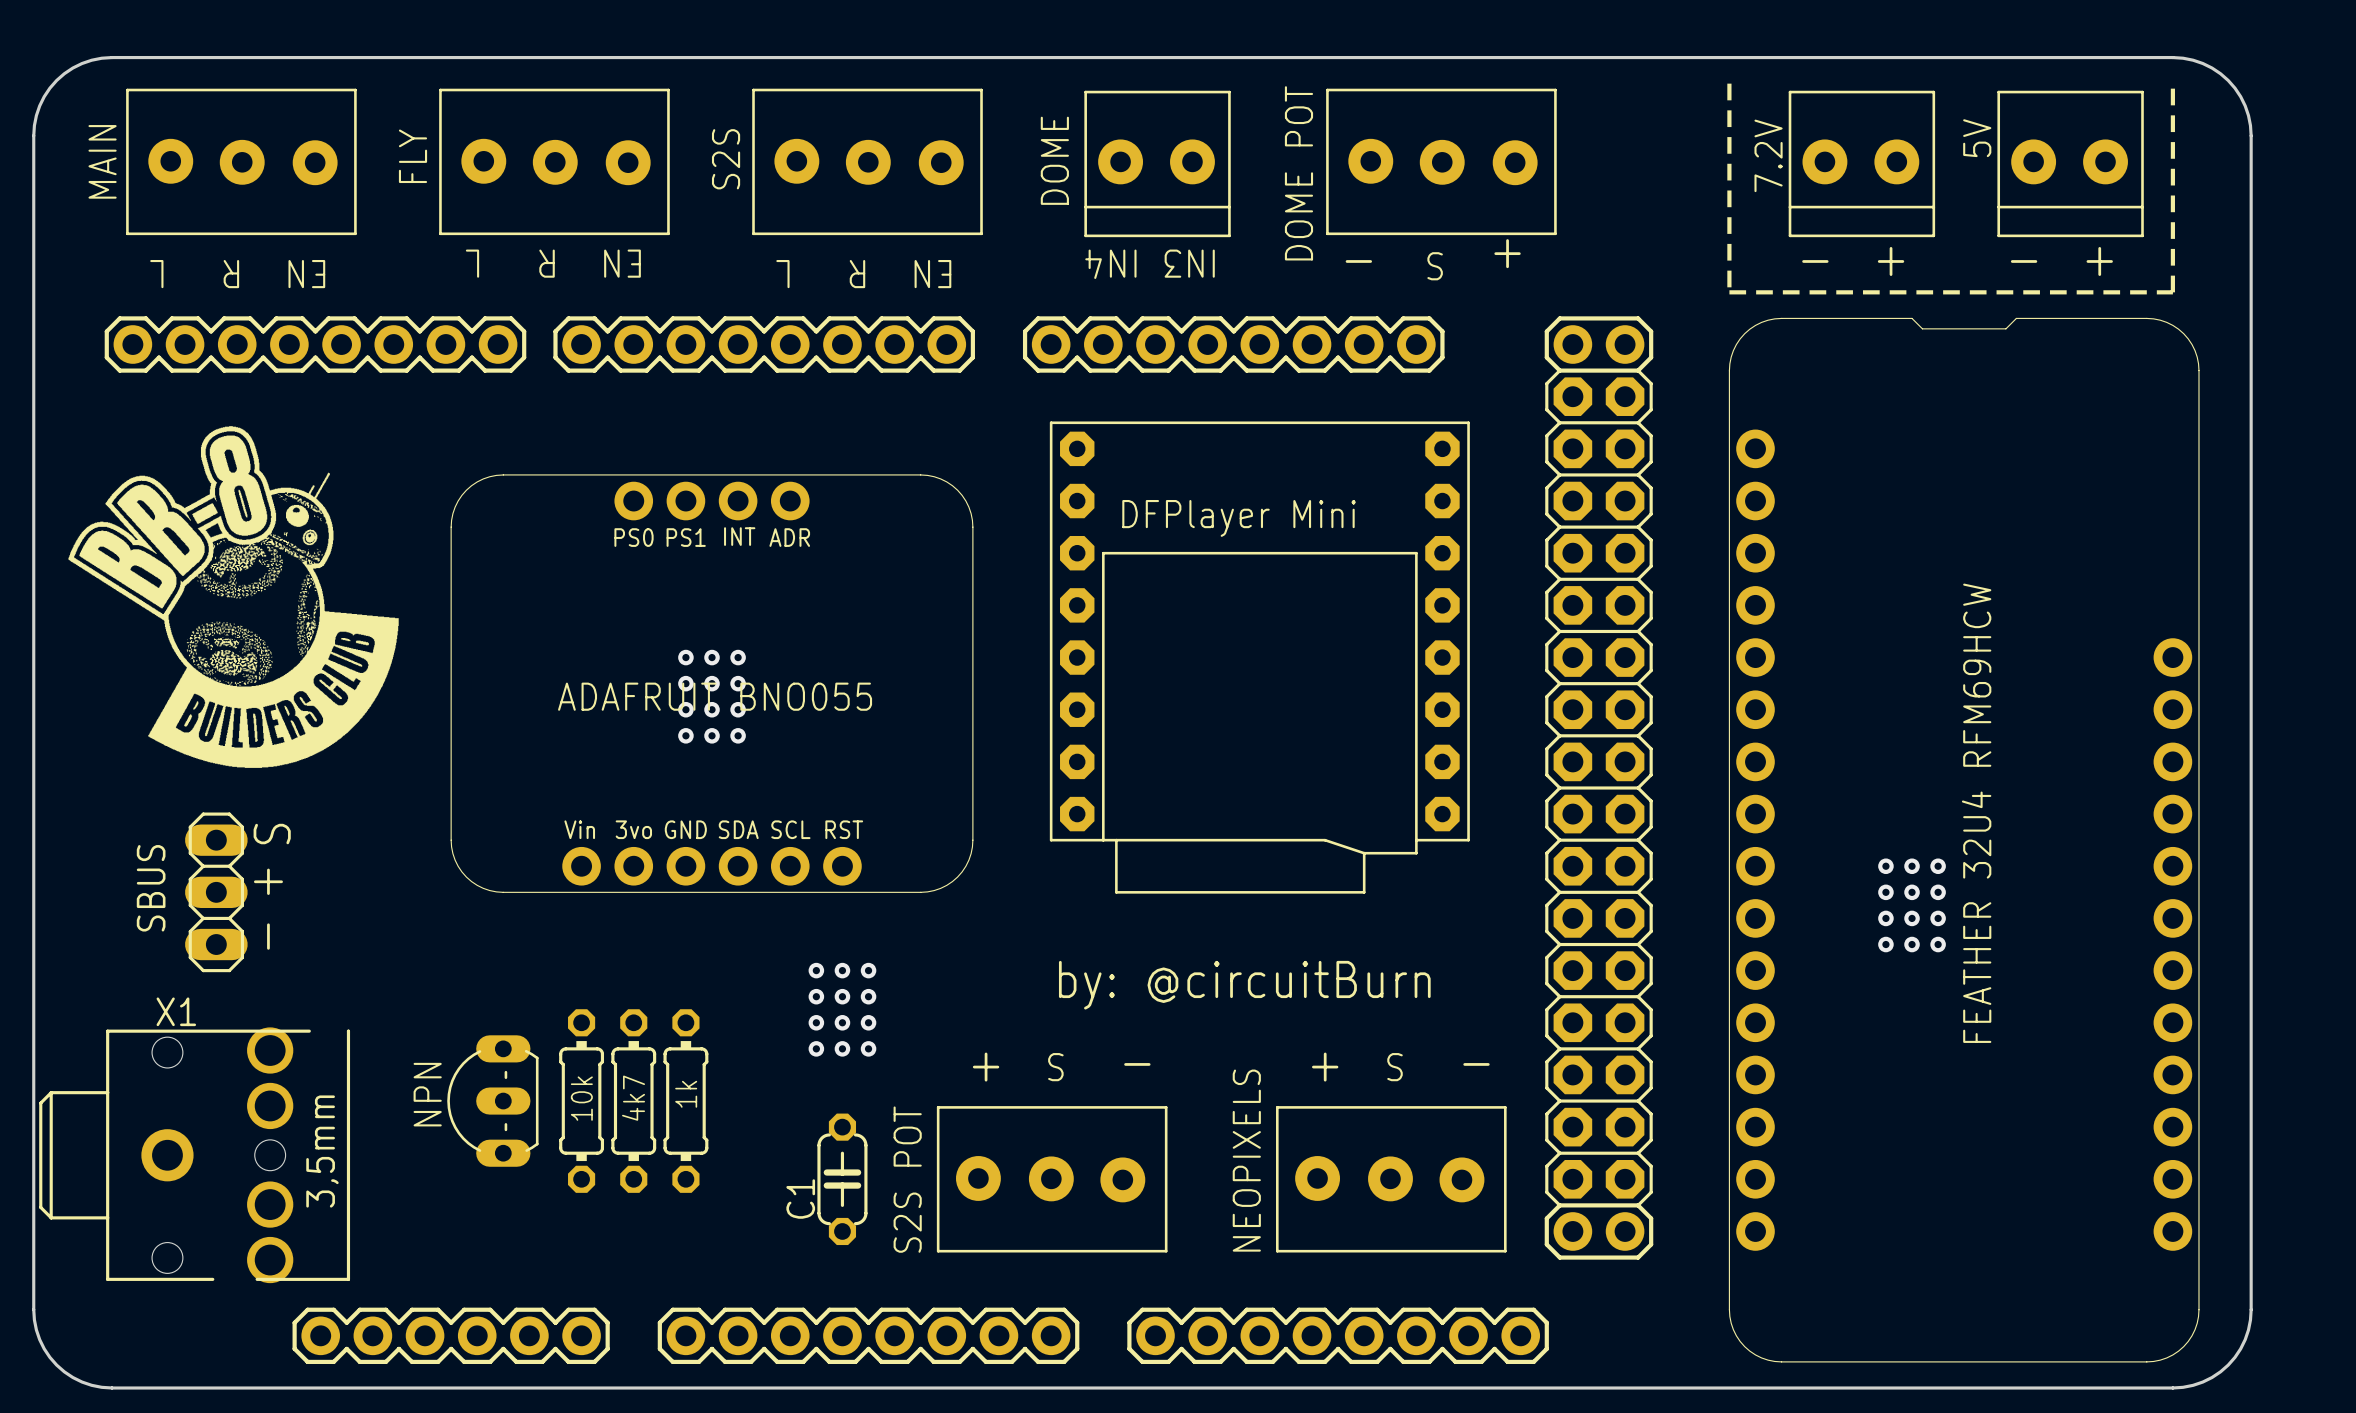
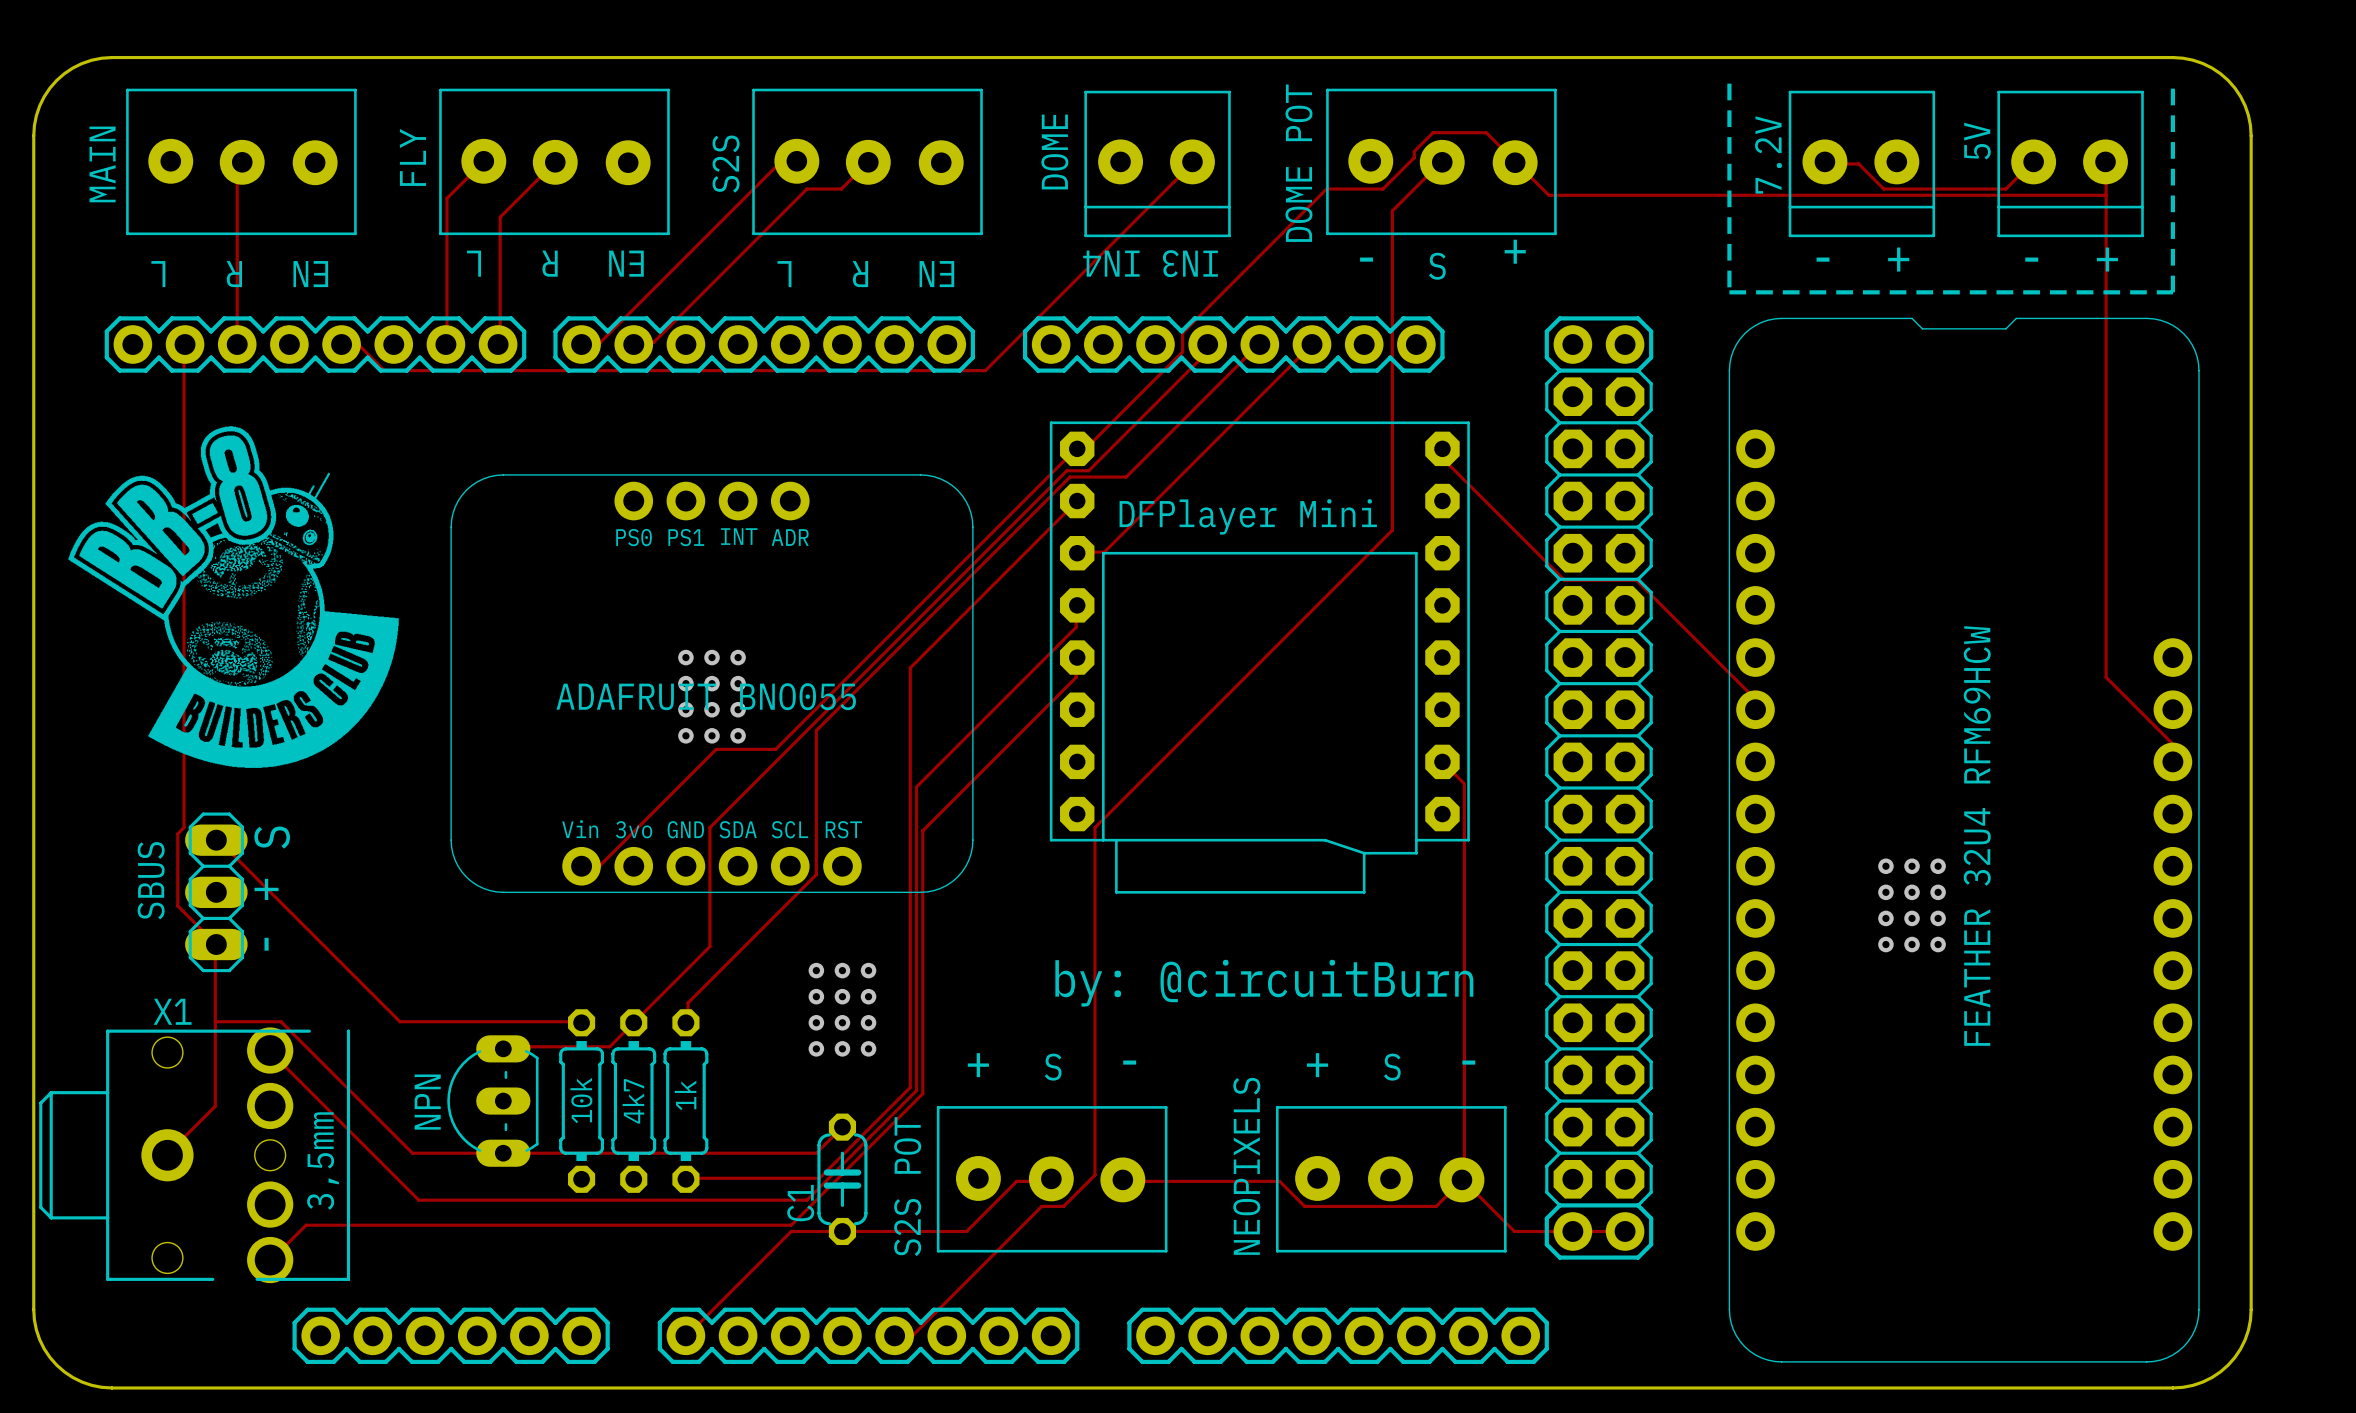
track: none -> (483, 161) (446, 198) (445, 344)
track: none -> (796, 161) (794, 163) (778, 163) (600, 342) (581, 342) (581, 344)
track: none -> (1192, 161) (985, 370) (384, 370) (359, 345) (341, 344)
track: none -> (1824, 161) (1827, 163) (1858, 163) (1883, 189) (2005, 189) (2033, 161)
track: none -> (2105, 161) (2106, 677) (2171, 743) (2172, 761)
track: none -> (242, 162) (237, 167) (237, 344)
track: none -> (555, 162) (500, 217) (500, 342) (498, 344)
track: none -> (868, 162) (841, 189) (806, 189) (653, 342) (634, 342) (633, 344)
track: none -> (1442, 162) (1392, 210) (1392, 530) (1094, 827) (1094, 1175) (1063, 1206) (1041, 1206) (913, 1334) (894, 1335)
track: none -> (2106, 195) (1548, 195) (1486, 132) (1433, 132) (1414, 151) (1414, 157) (1382, 189) (1326, 189) (1182, 333) (1182, 351) (1085, 448) (1076, 448) (775, 749) (716, 749) (600, 865) (581, 866)
track: none -> (185, 344) (184, 827) (177, 833) (177, 905) (216, 944) (215, 1106) (167, 1155)
track: none -> (1207, 344) (1207, 351) (1088, 470) (1066, 470) (709, 827) (709, 946) (609, 1046) (503, 1046) (503, 1048)
track: none -> (1259, 344) (1126, 477) (1069, 477) (816, 730) (816, 874) (688, 1002) (688, 1021) (685, 1022)
track: none -> (1312, 344) (1104, 552) (1077, 553)
track: none -> (1442, 448) (1442, 458) (1564, 580) (1636, 580) (1755, 699) (1755, 709)
track: none -> (1077, 501) (910, 667) (910, 1087) (819, 1178) (685, 1179)
track: none -> (1077, 605) (1076, 627) (916, 786) (916, 1090) (806, 1200) (418, 1200) (270, 1050)
track: none -> (1077, 657) (1076, 677) (922, 830) (922, 1093) (791, 1225) (306, 1225) (270, 1260)
track: none -> (1442, 761) (1464, 783) (1464, 1178) (1461, 1179)
track: none -> (216, 840) (400, 1021) (581, 1022)
track: none -> (215, 1021) (281, 1021) (412, 1153) (816, 1153) (842, 1127)
track: none -> (1051, 1178) (1051, 1181) (1016, 1181) (966, 1231) (791, 1231) (685, 1335)
track: none -> (1122, 1179) (1279, 1181) (1304, 1206) (1436, 1206) (1461, 1179)
track: none -> (1461, 1179) (1514, 1231) (1625, 1231)

